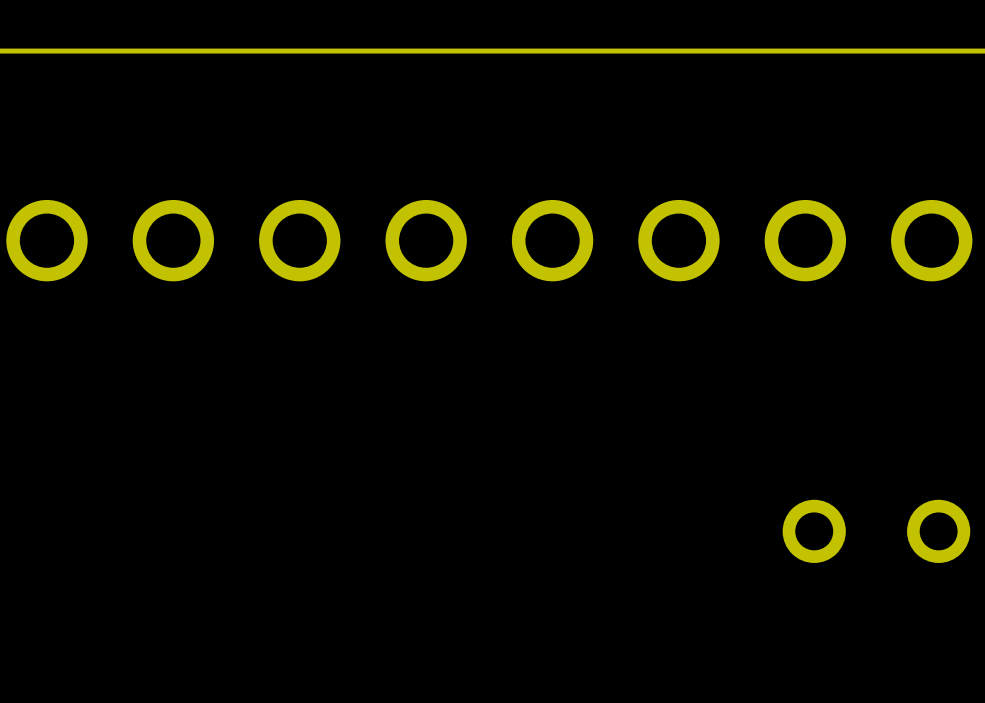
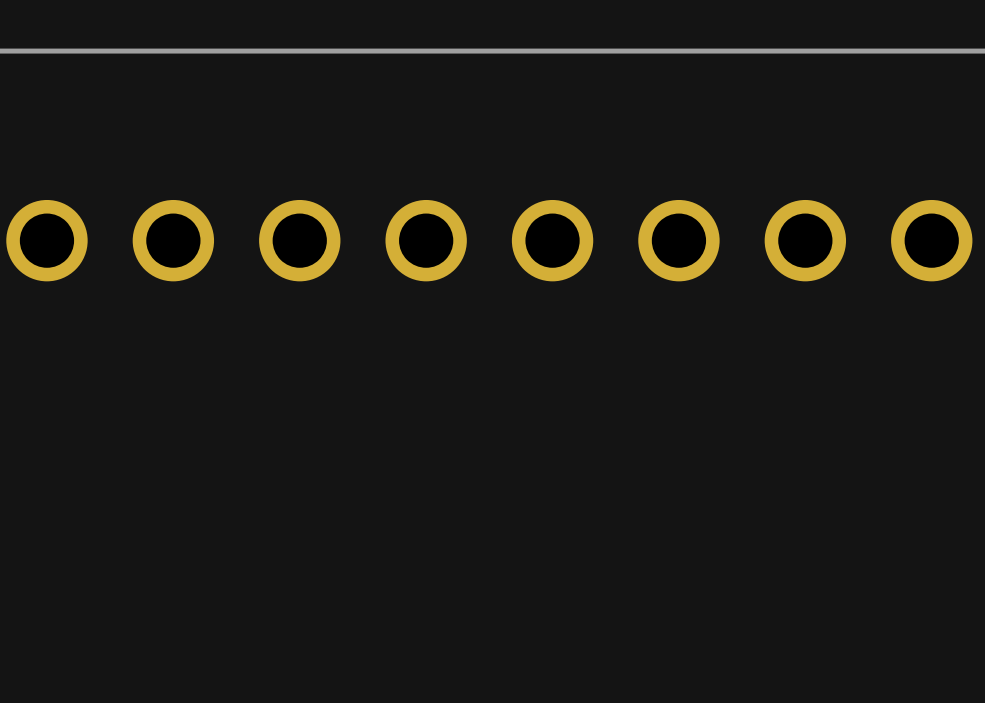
part: (876, 531) -> none

